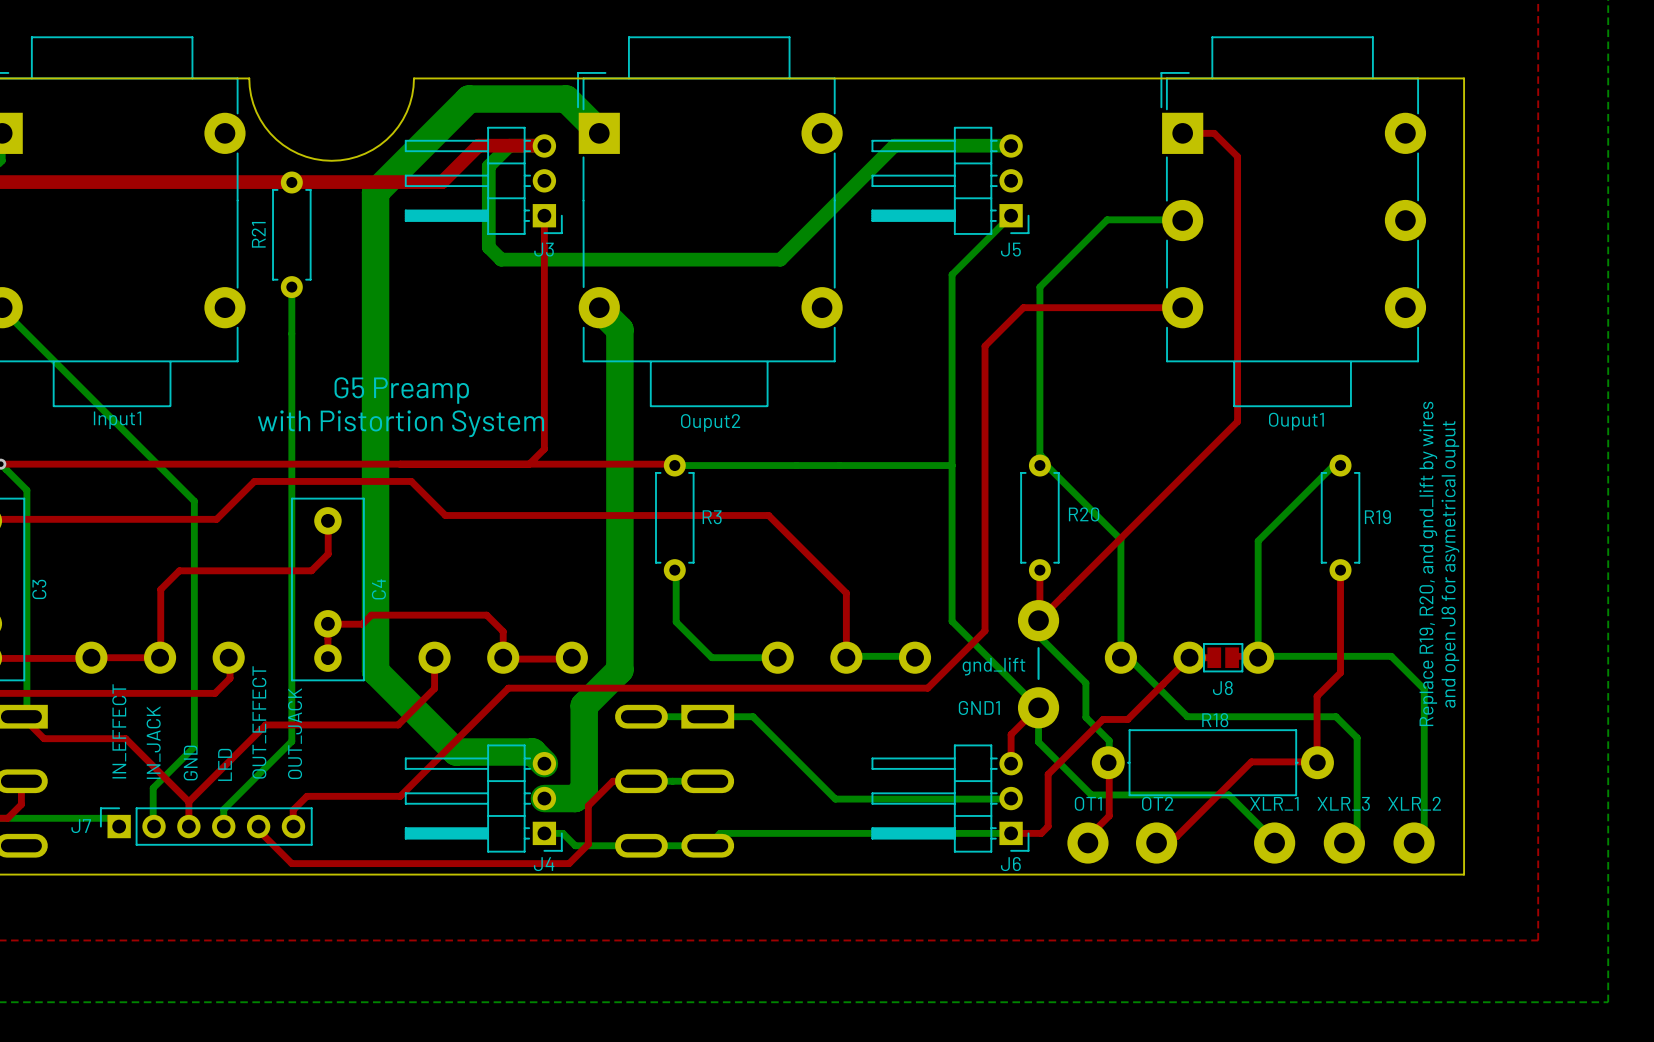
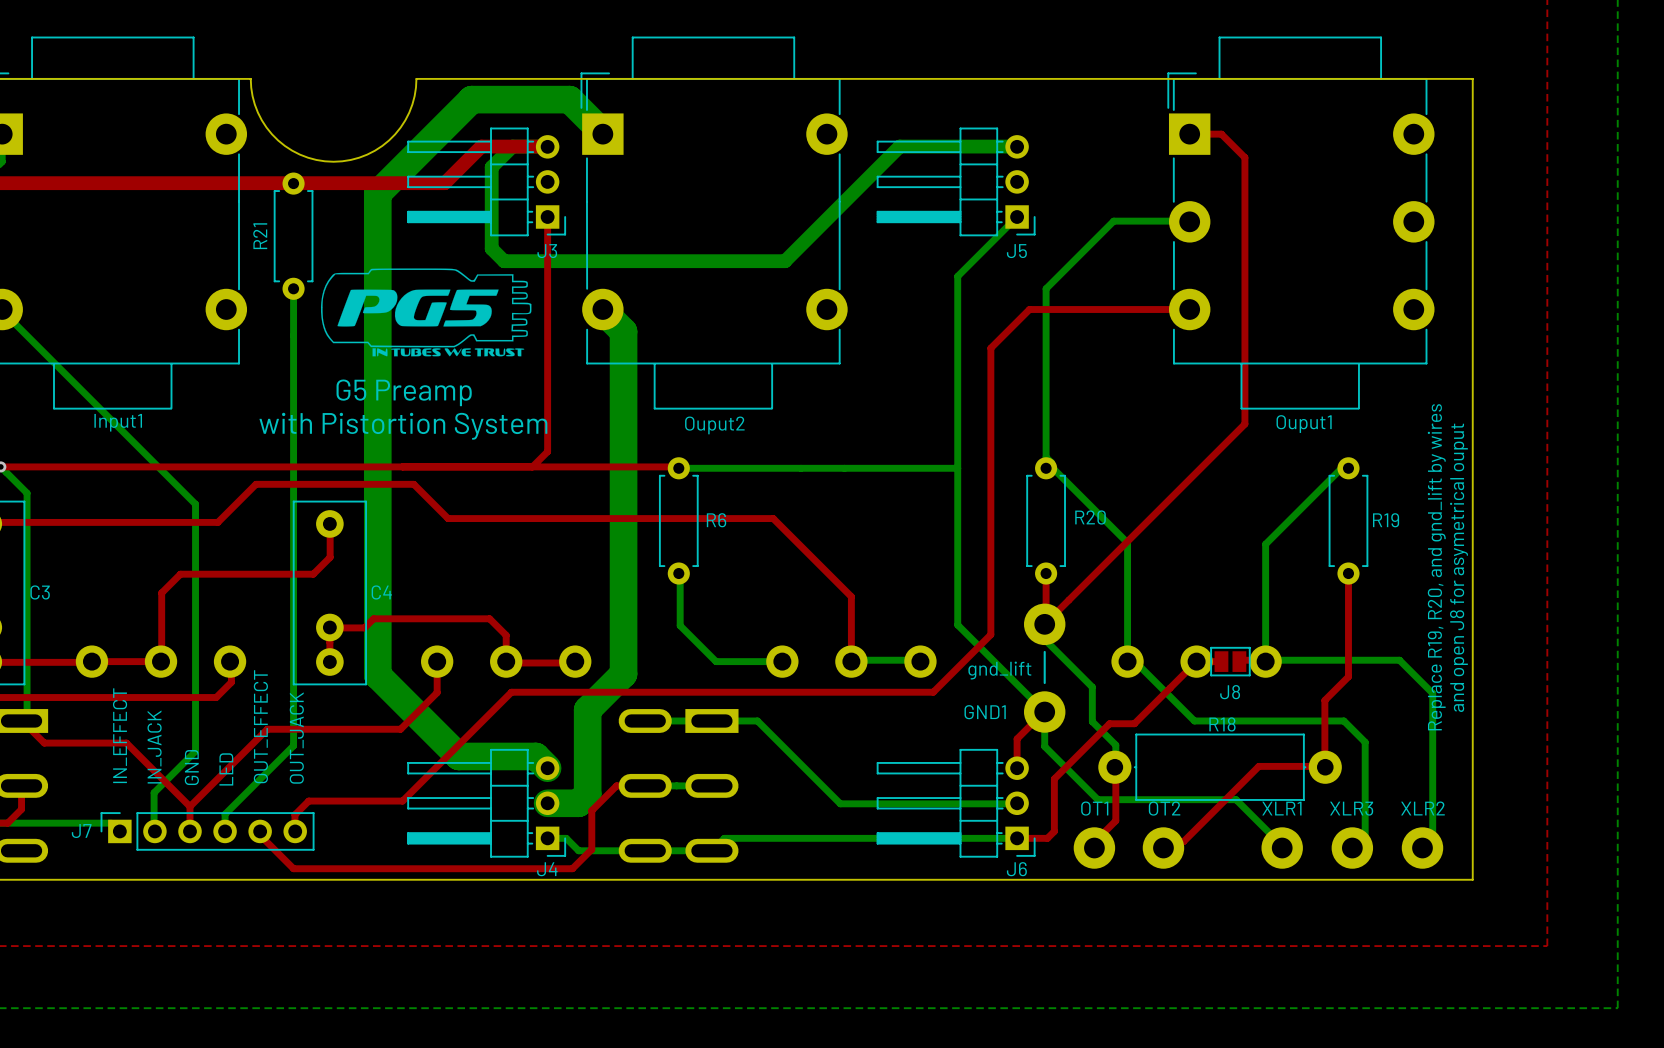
drawing: none -> [320, 268, 532, 357]
R3 name: R3 (712, 517) -> R6 (716, 520)
C3 name rotation: 0° (39, 589) -> 90° clockwise (40, 592)
C4 name rotation: 0° (378, 589) -> 90° clockwise (381, 592)
XLR_1 name: XLR_1 (1274, 803) -> XLR1 (1281, 808)
XLR_3 name: XLR_3 (1343, 803) -> XLR3 (1351, 808)
XLR_2 name: XLR_2 (1414, 803) -> XLR2 (1422, 808)

